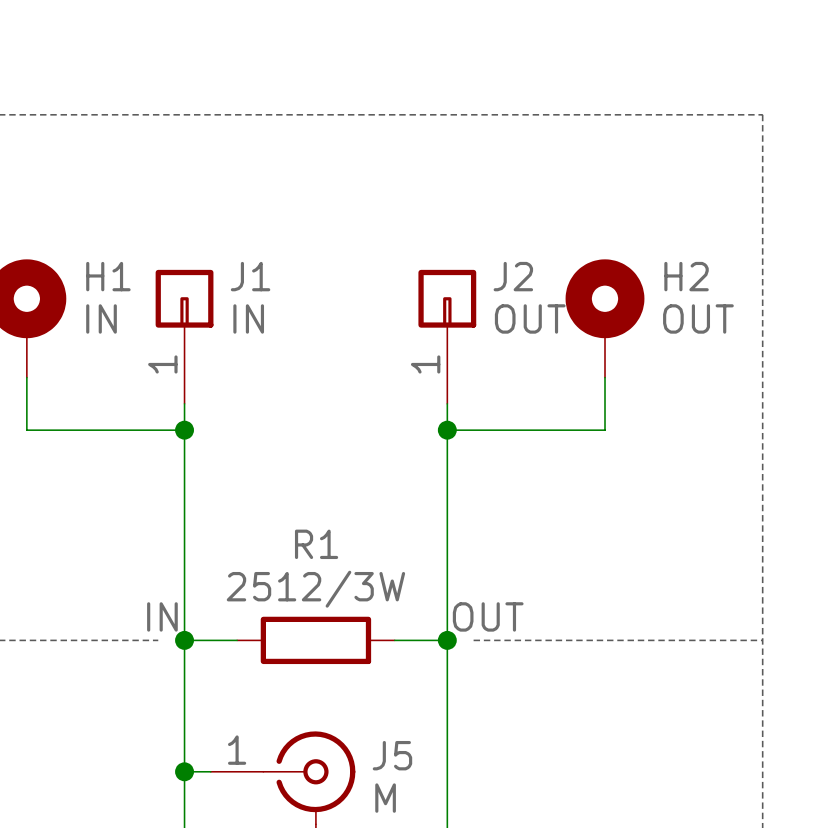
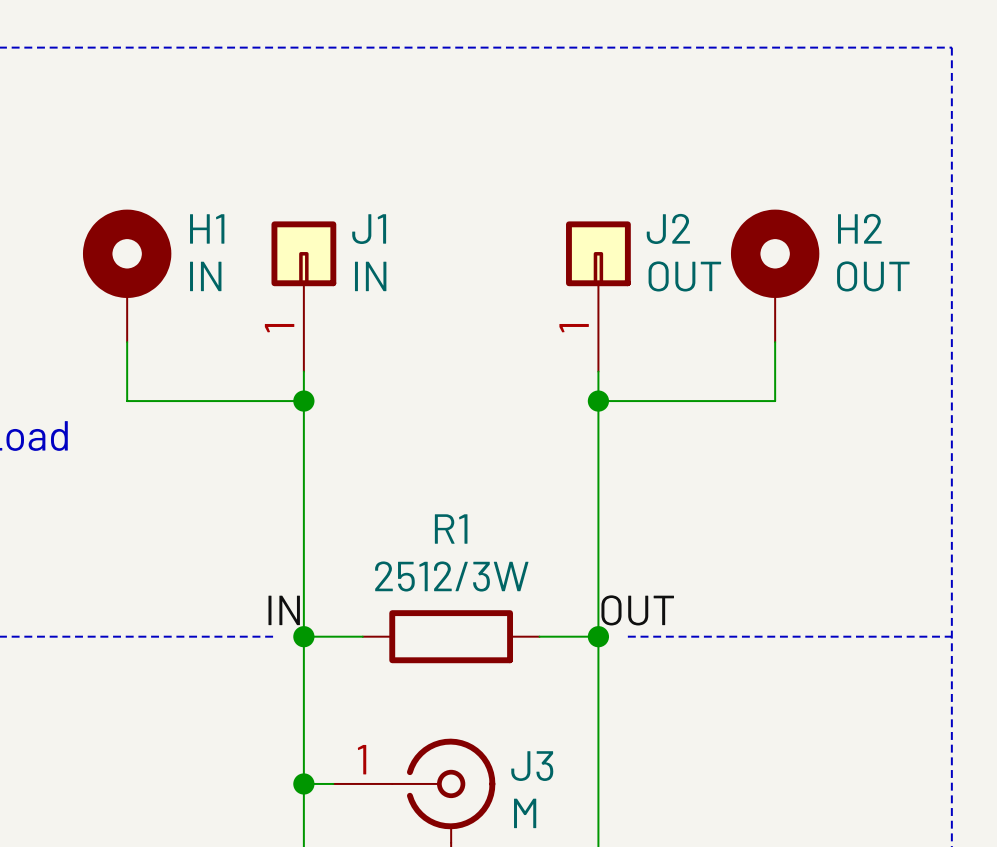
J5 name: J5 (392, 755) -> J3 (532, 766)

